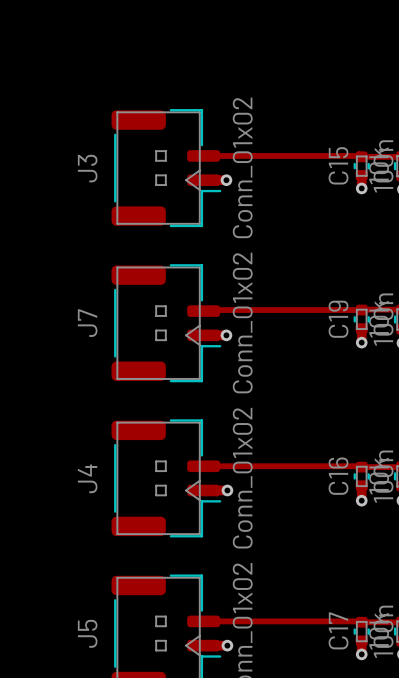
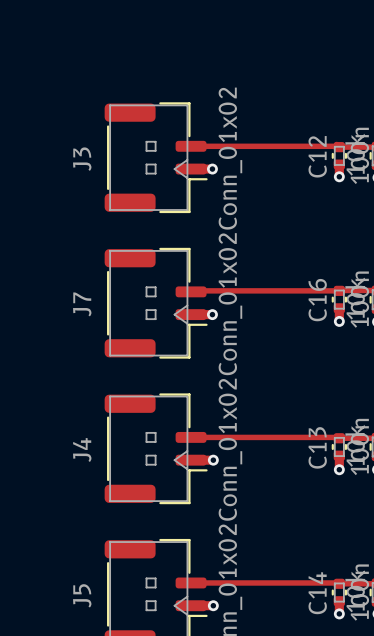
C15 name: C15 (338, 165) -> C12 (317, 156)
C19 name: C19 (338, 319) -> C16 (317, 300)
C16 name: C16 (338, 476) -> C13 (317, 447)
C17 name: C17 (338, 630) -> C14 (317, 593)

